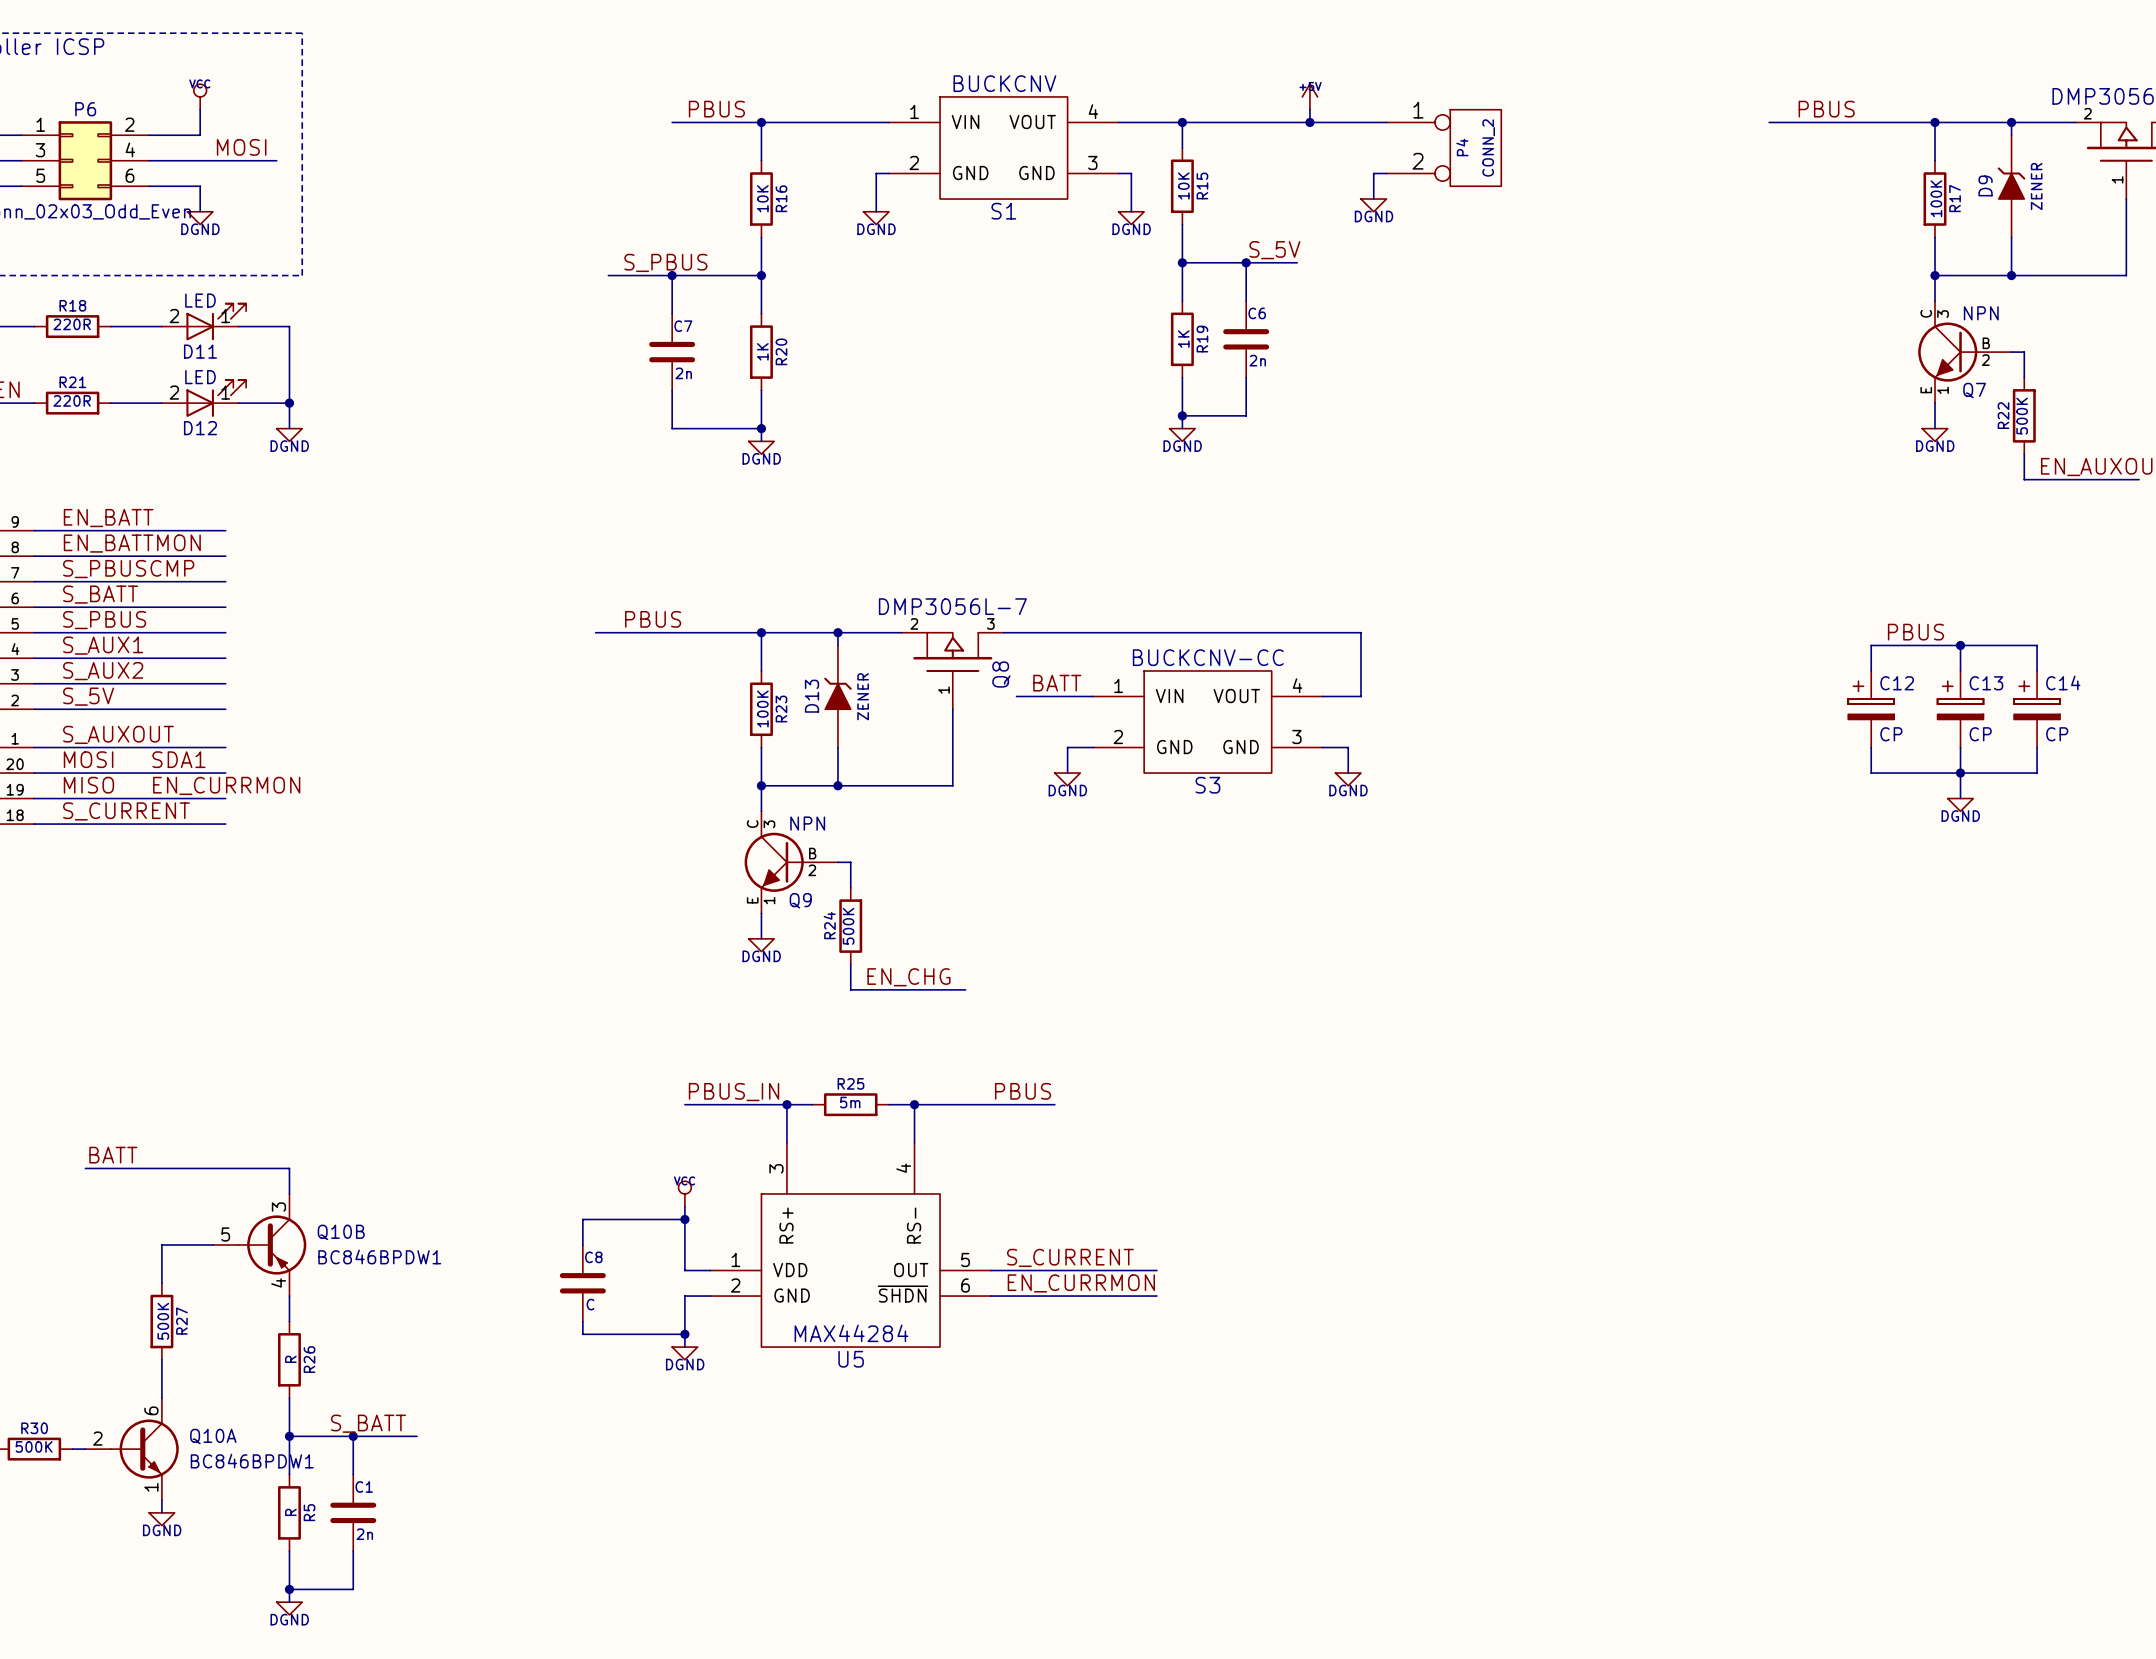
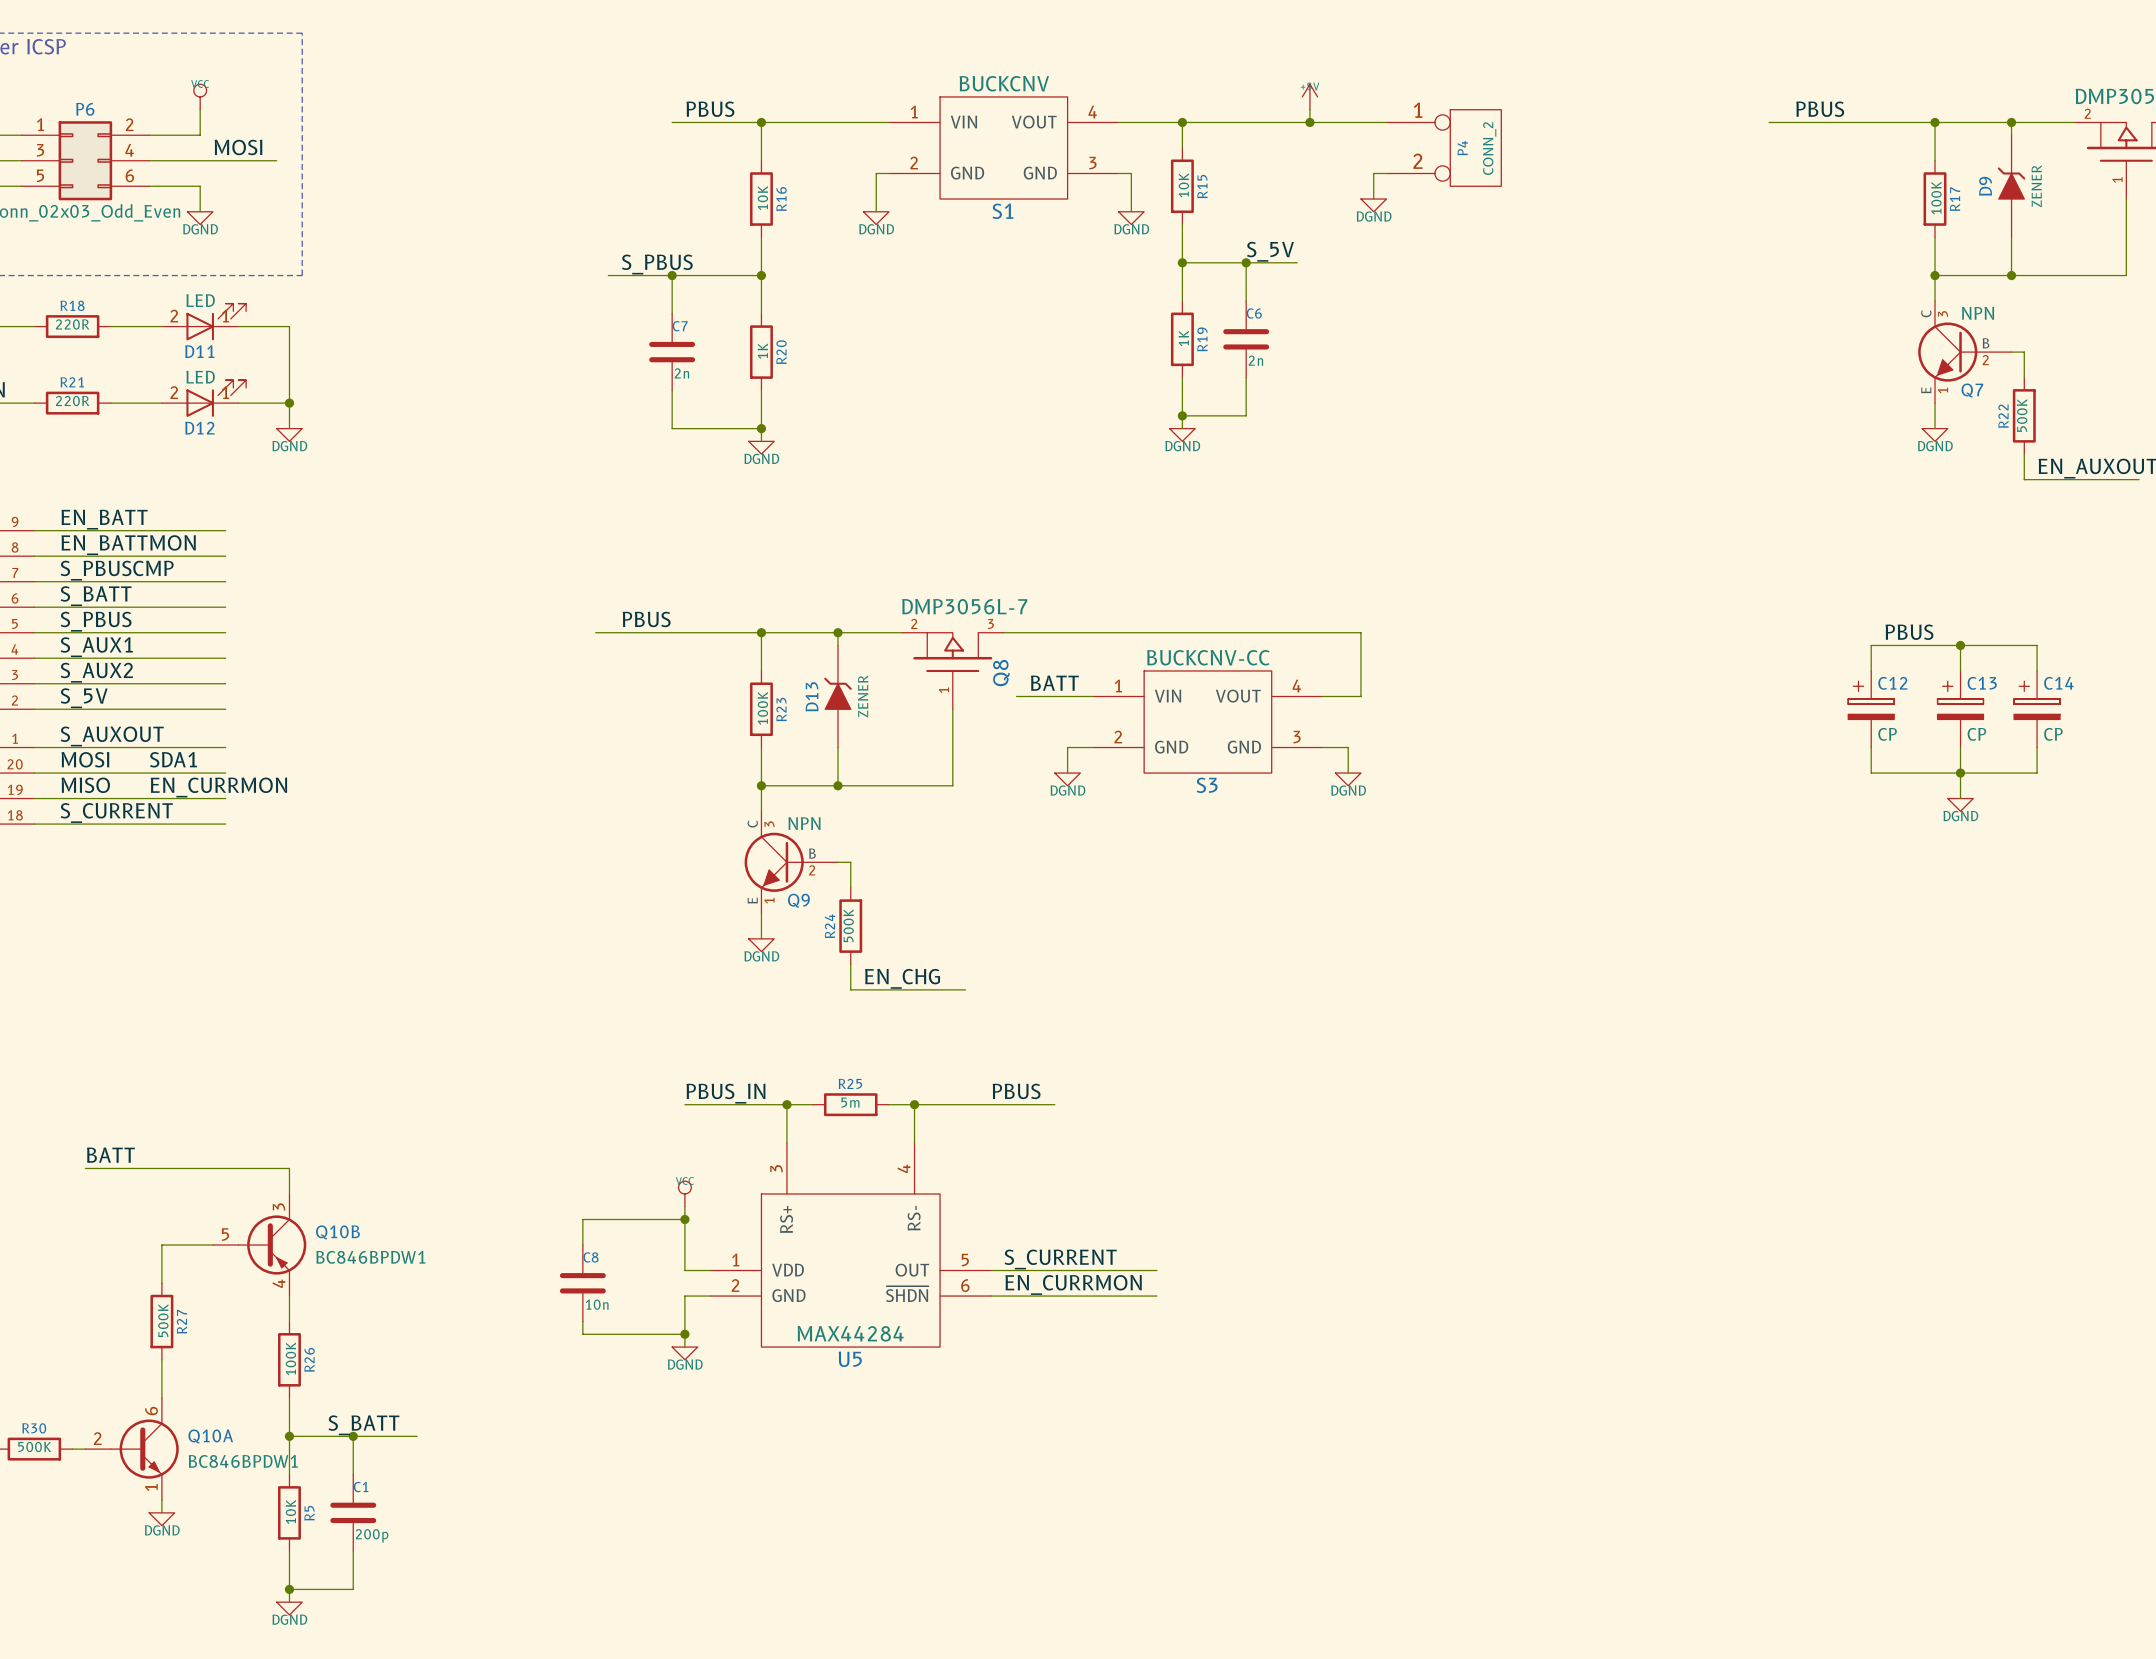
C8 value: C (590, 1304) -> 10n (597, 1304)
R26 value: R (290, 1359) -> 100K (290, 1358)
R5 value: R (290, 1512) -> 10K (290, 1512)
C1 value: 2n (364, 1534) -> 200p (372, 1535)

